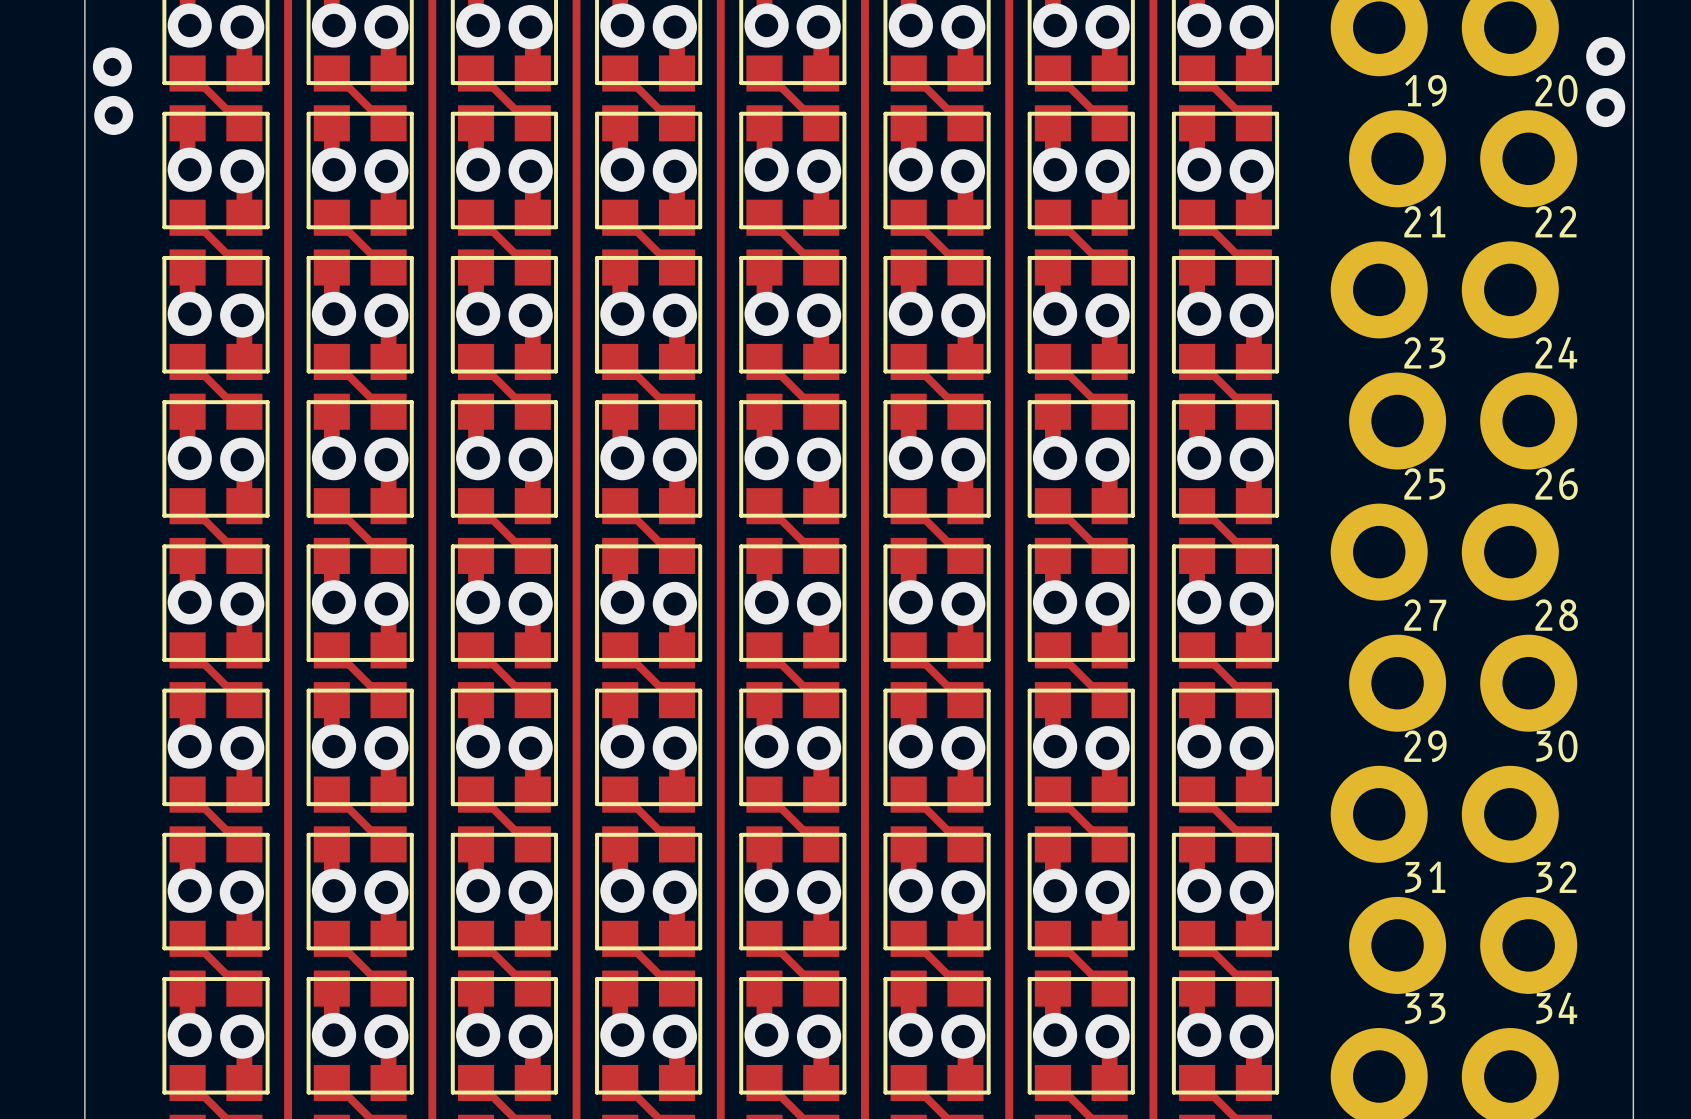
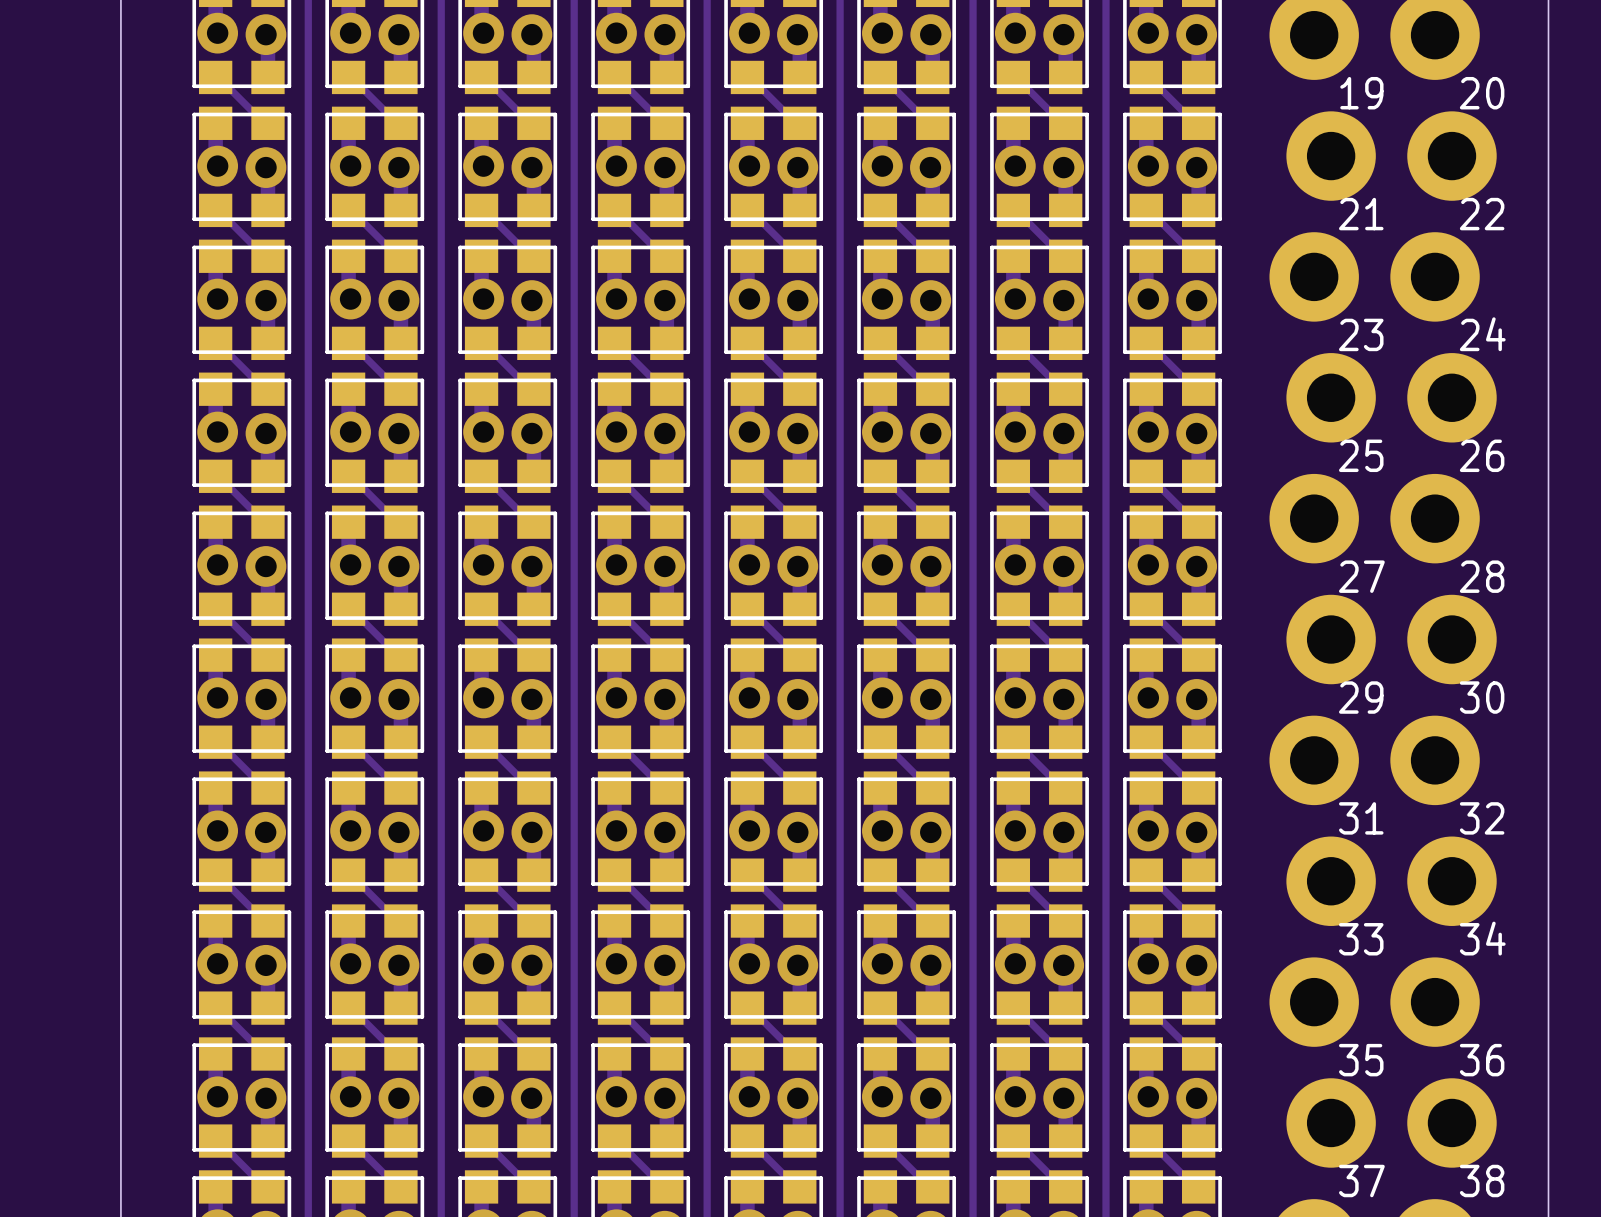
via: (1605, 56) -> none
via: (112, 66) -> none
via: (1605, 107) -> none
via: (113, 115) -> none

